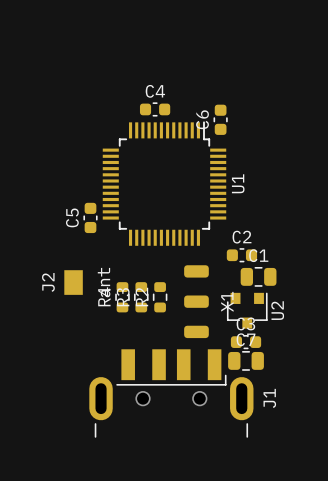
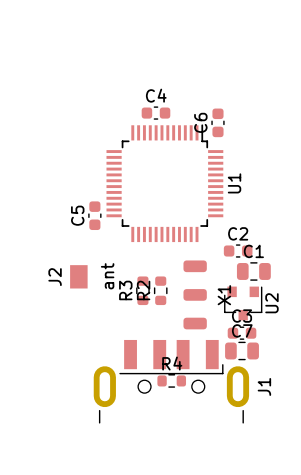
R4 rotation: 0° (122, 297) -> 90° clockwise (171, 380)
R4 position: (122, 297) -> (171, 380)

